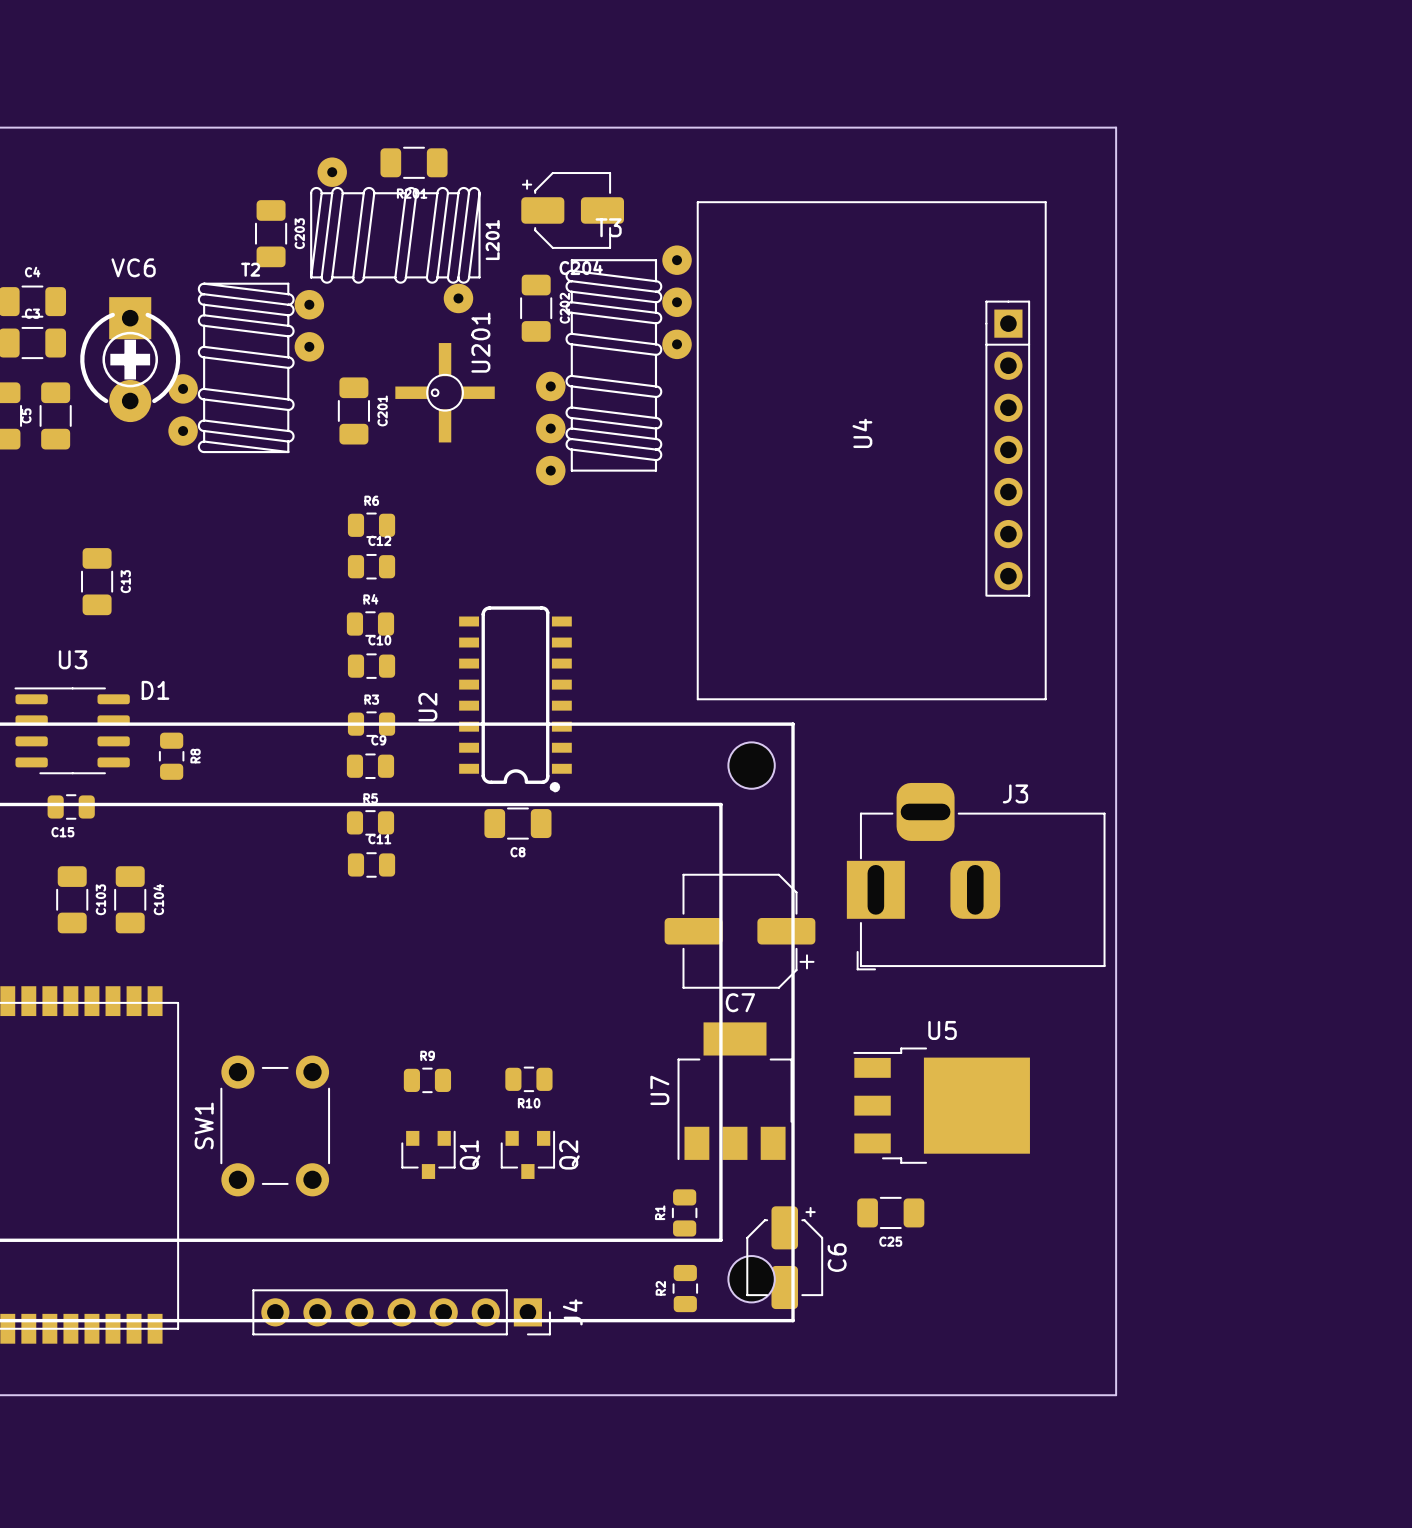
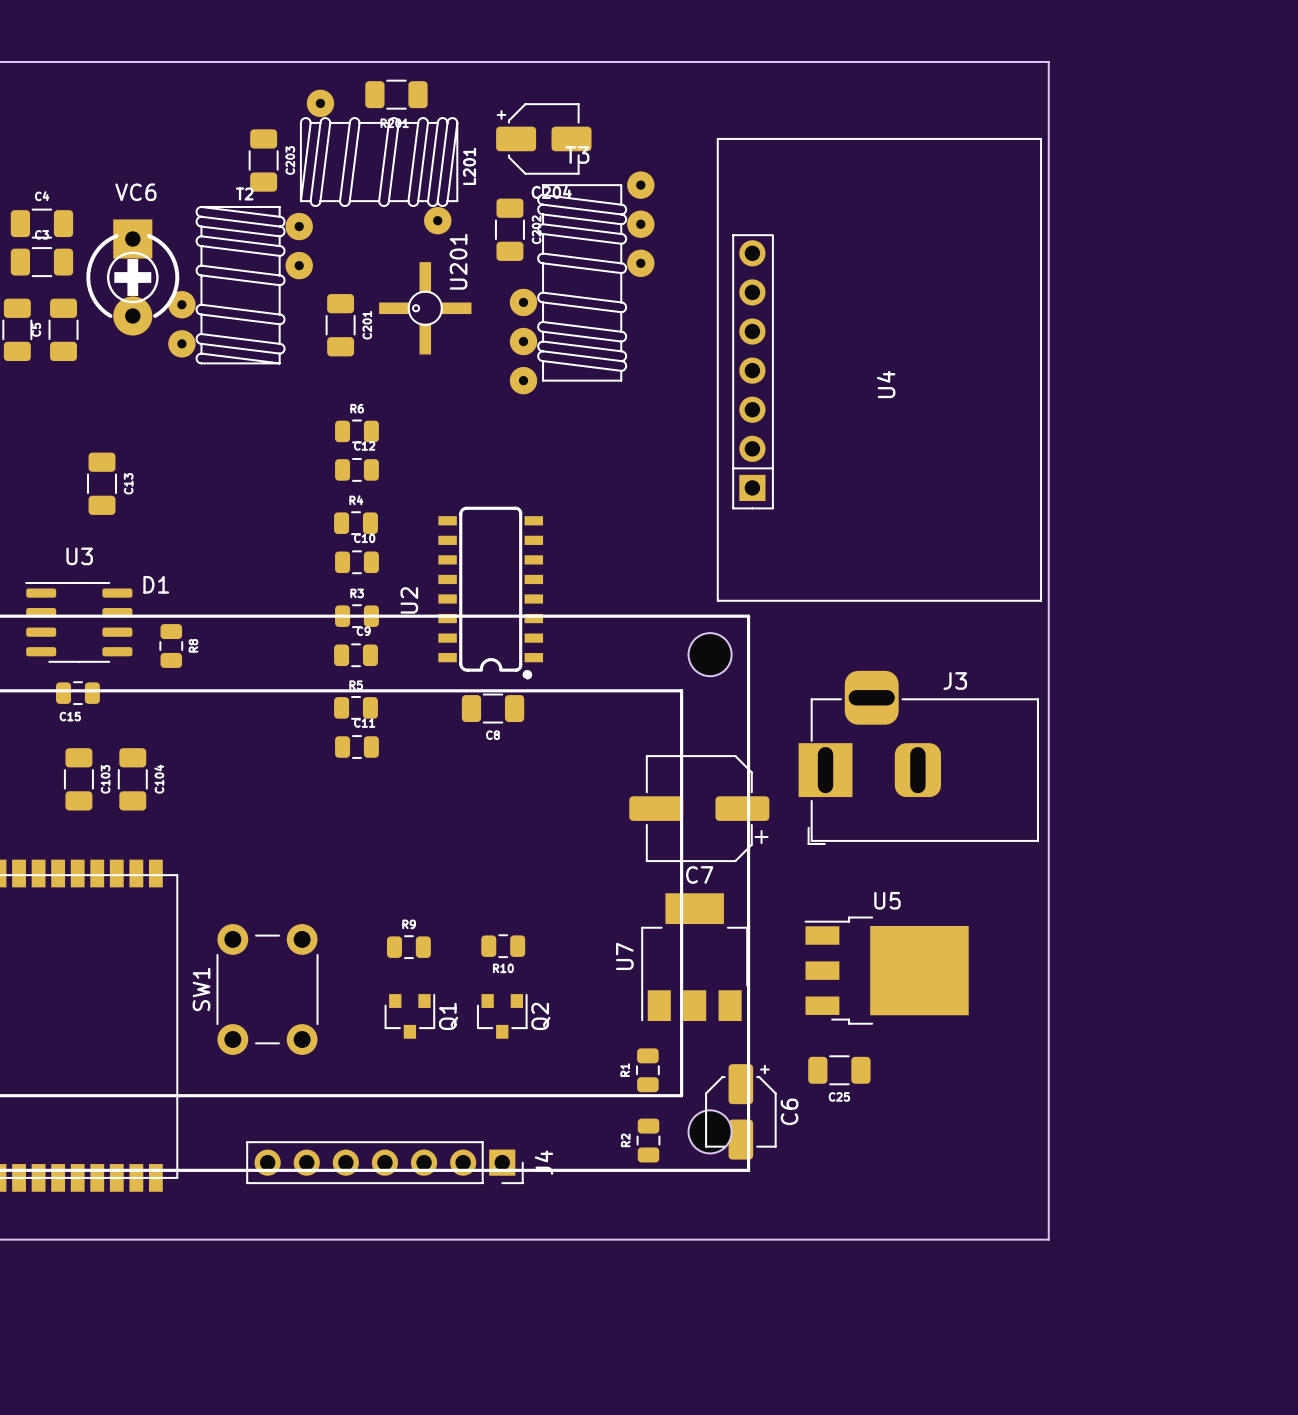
U4 rotation: 0° (871, 450) -> 180° (879, 369)

